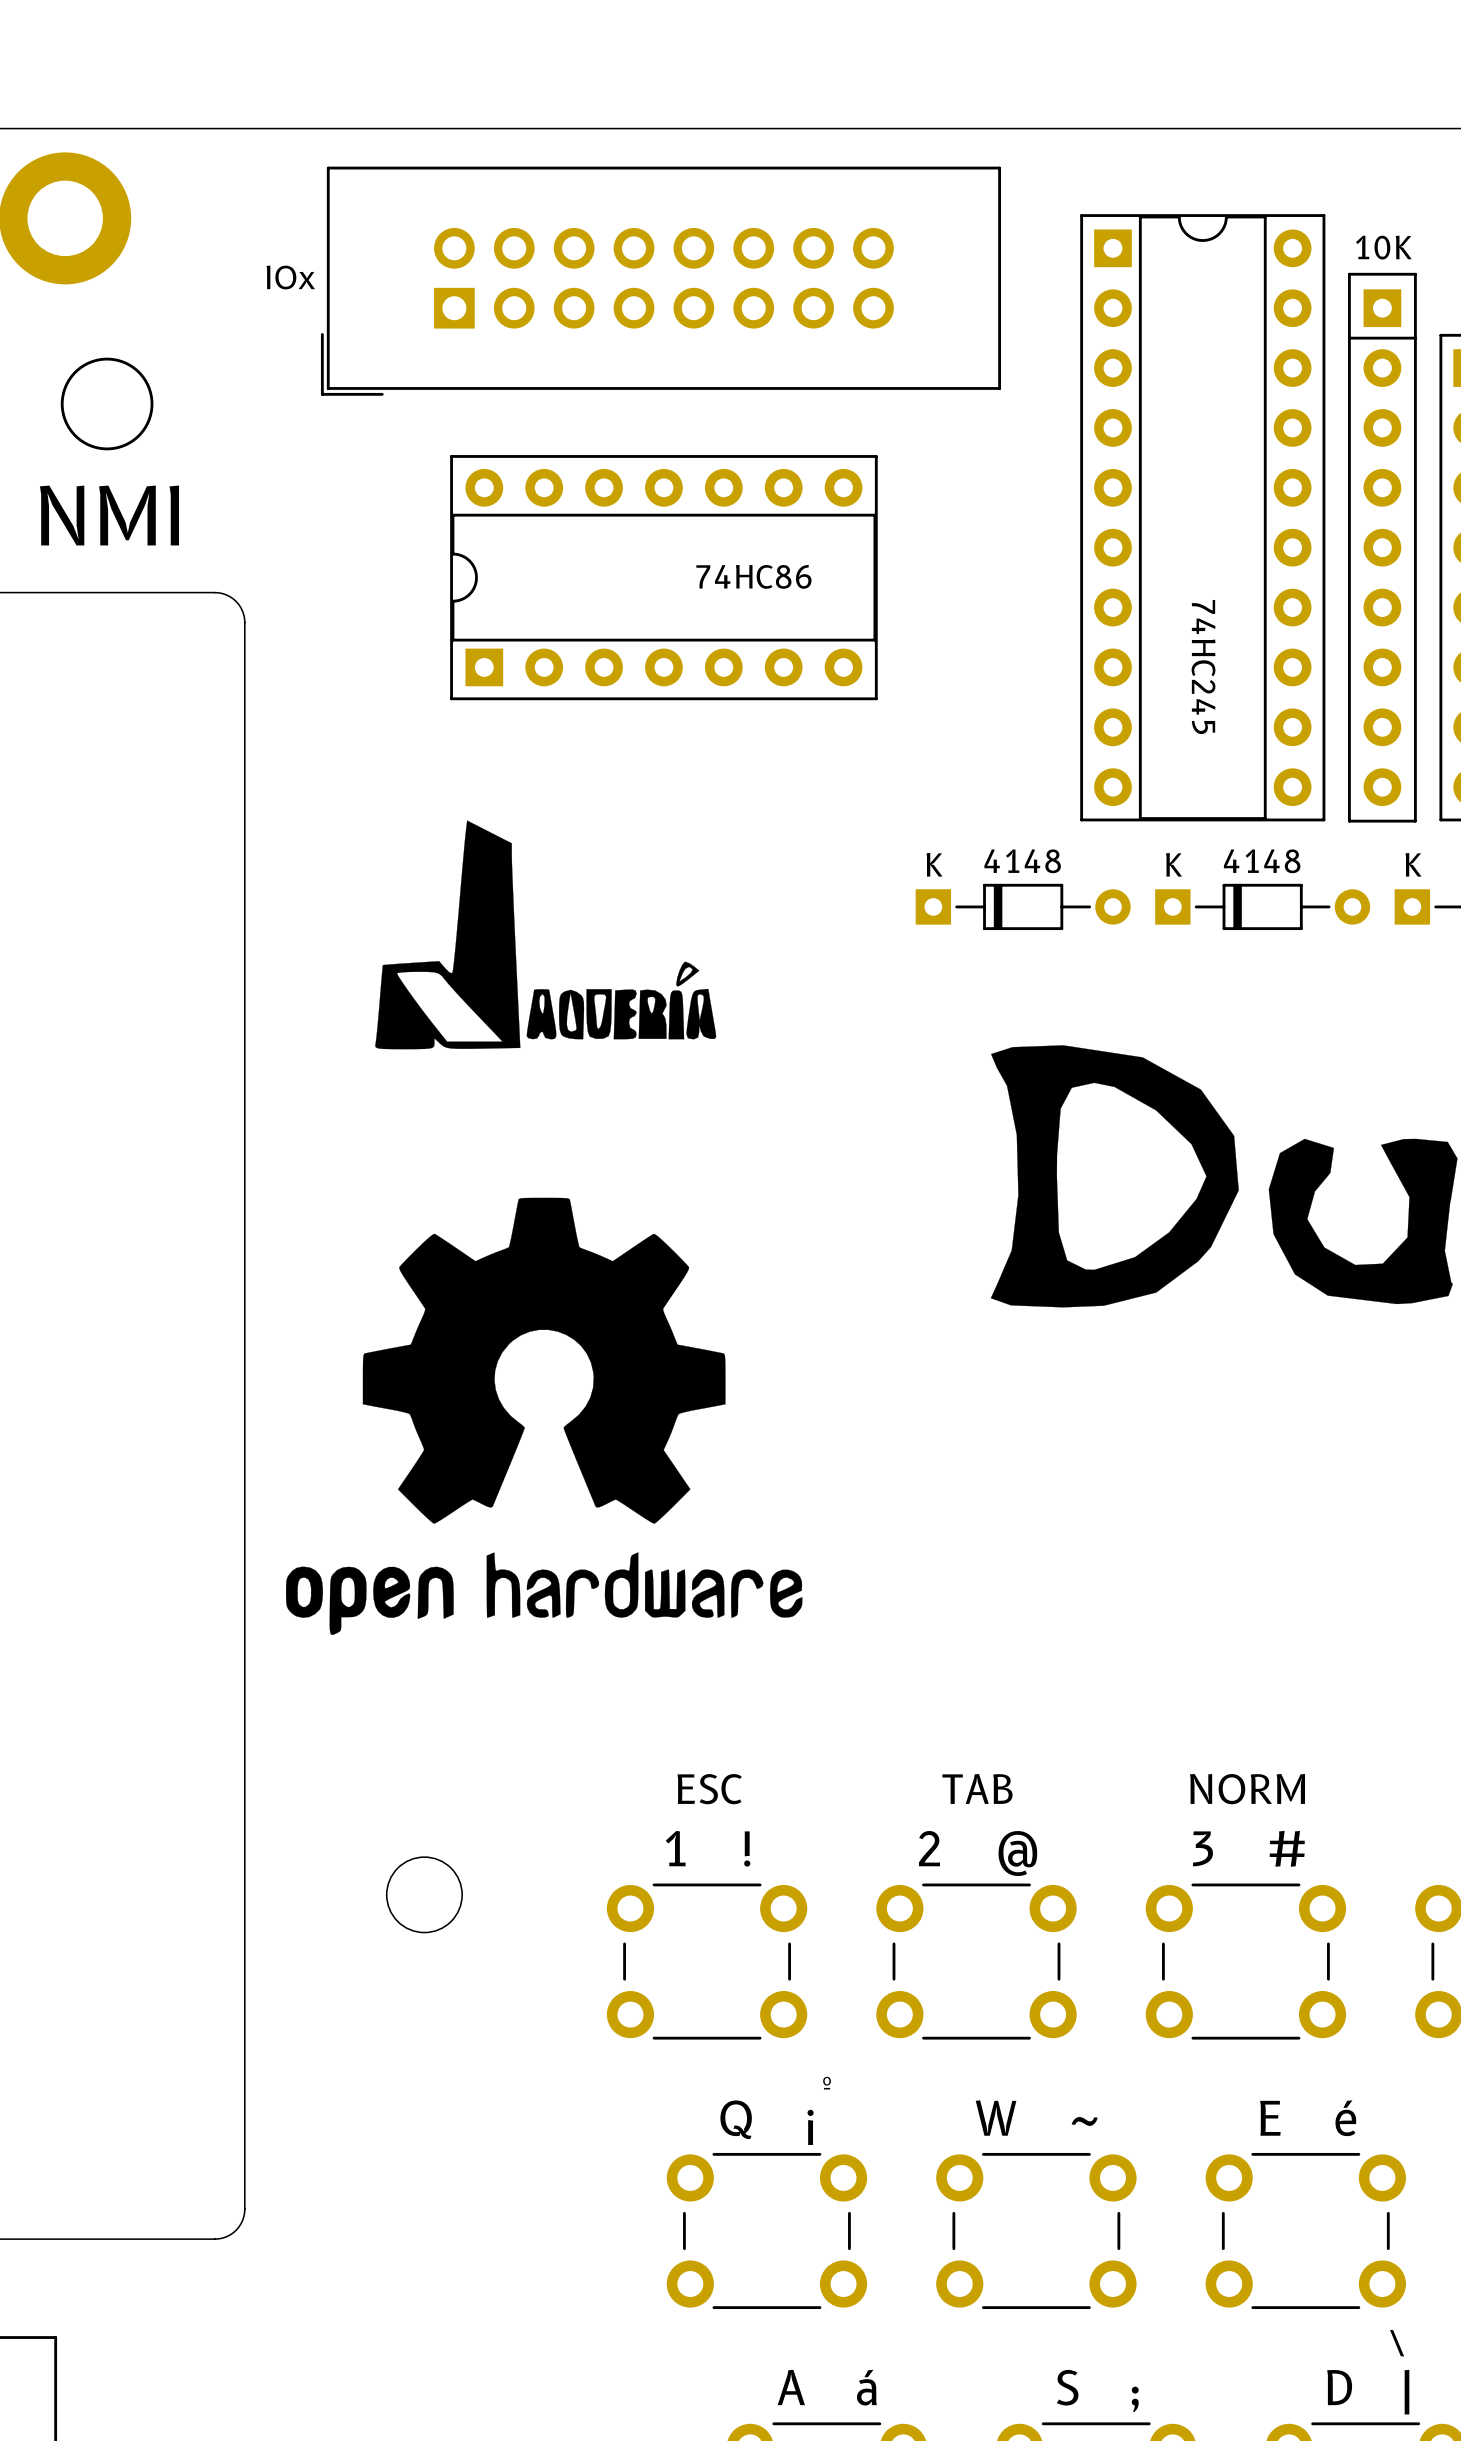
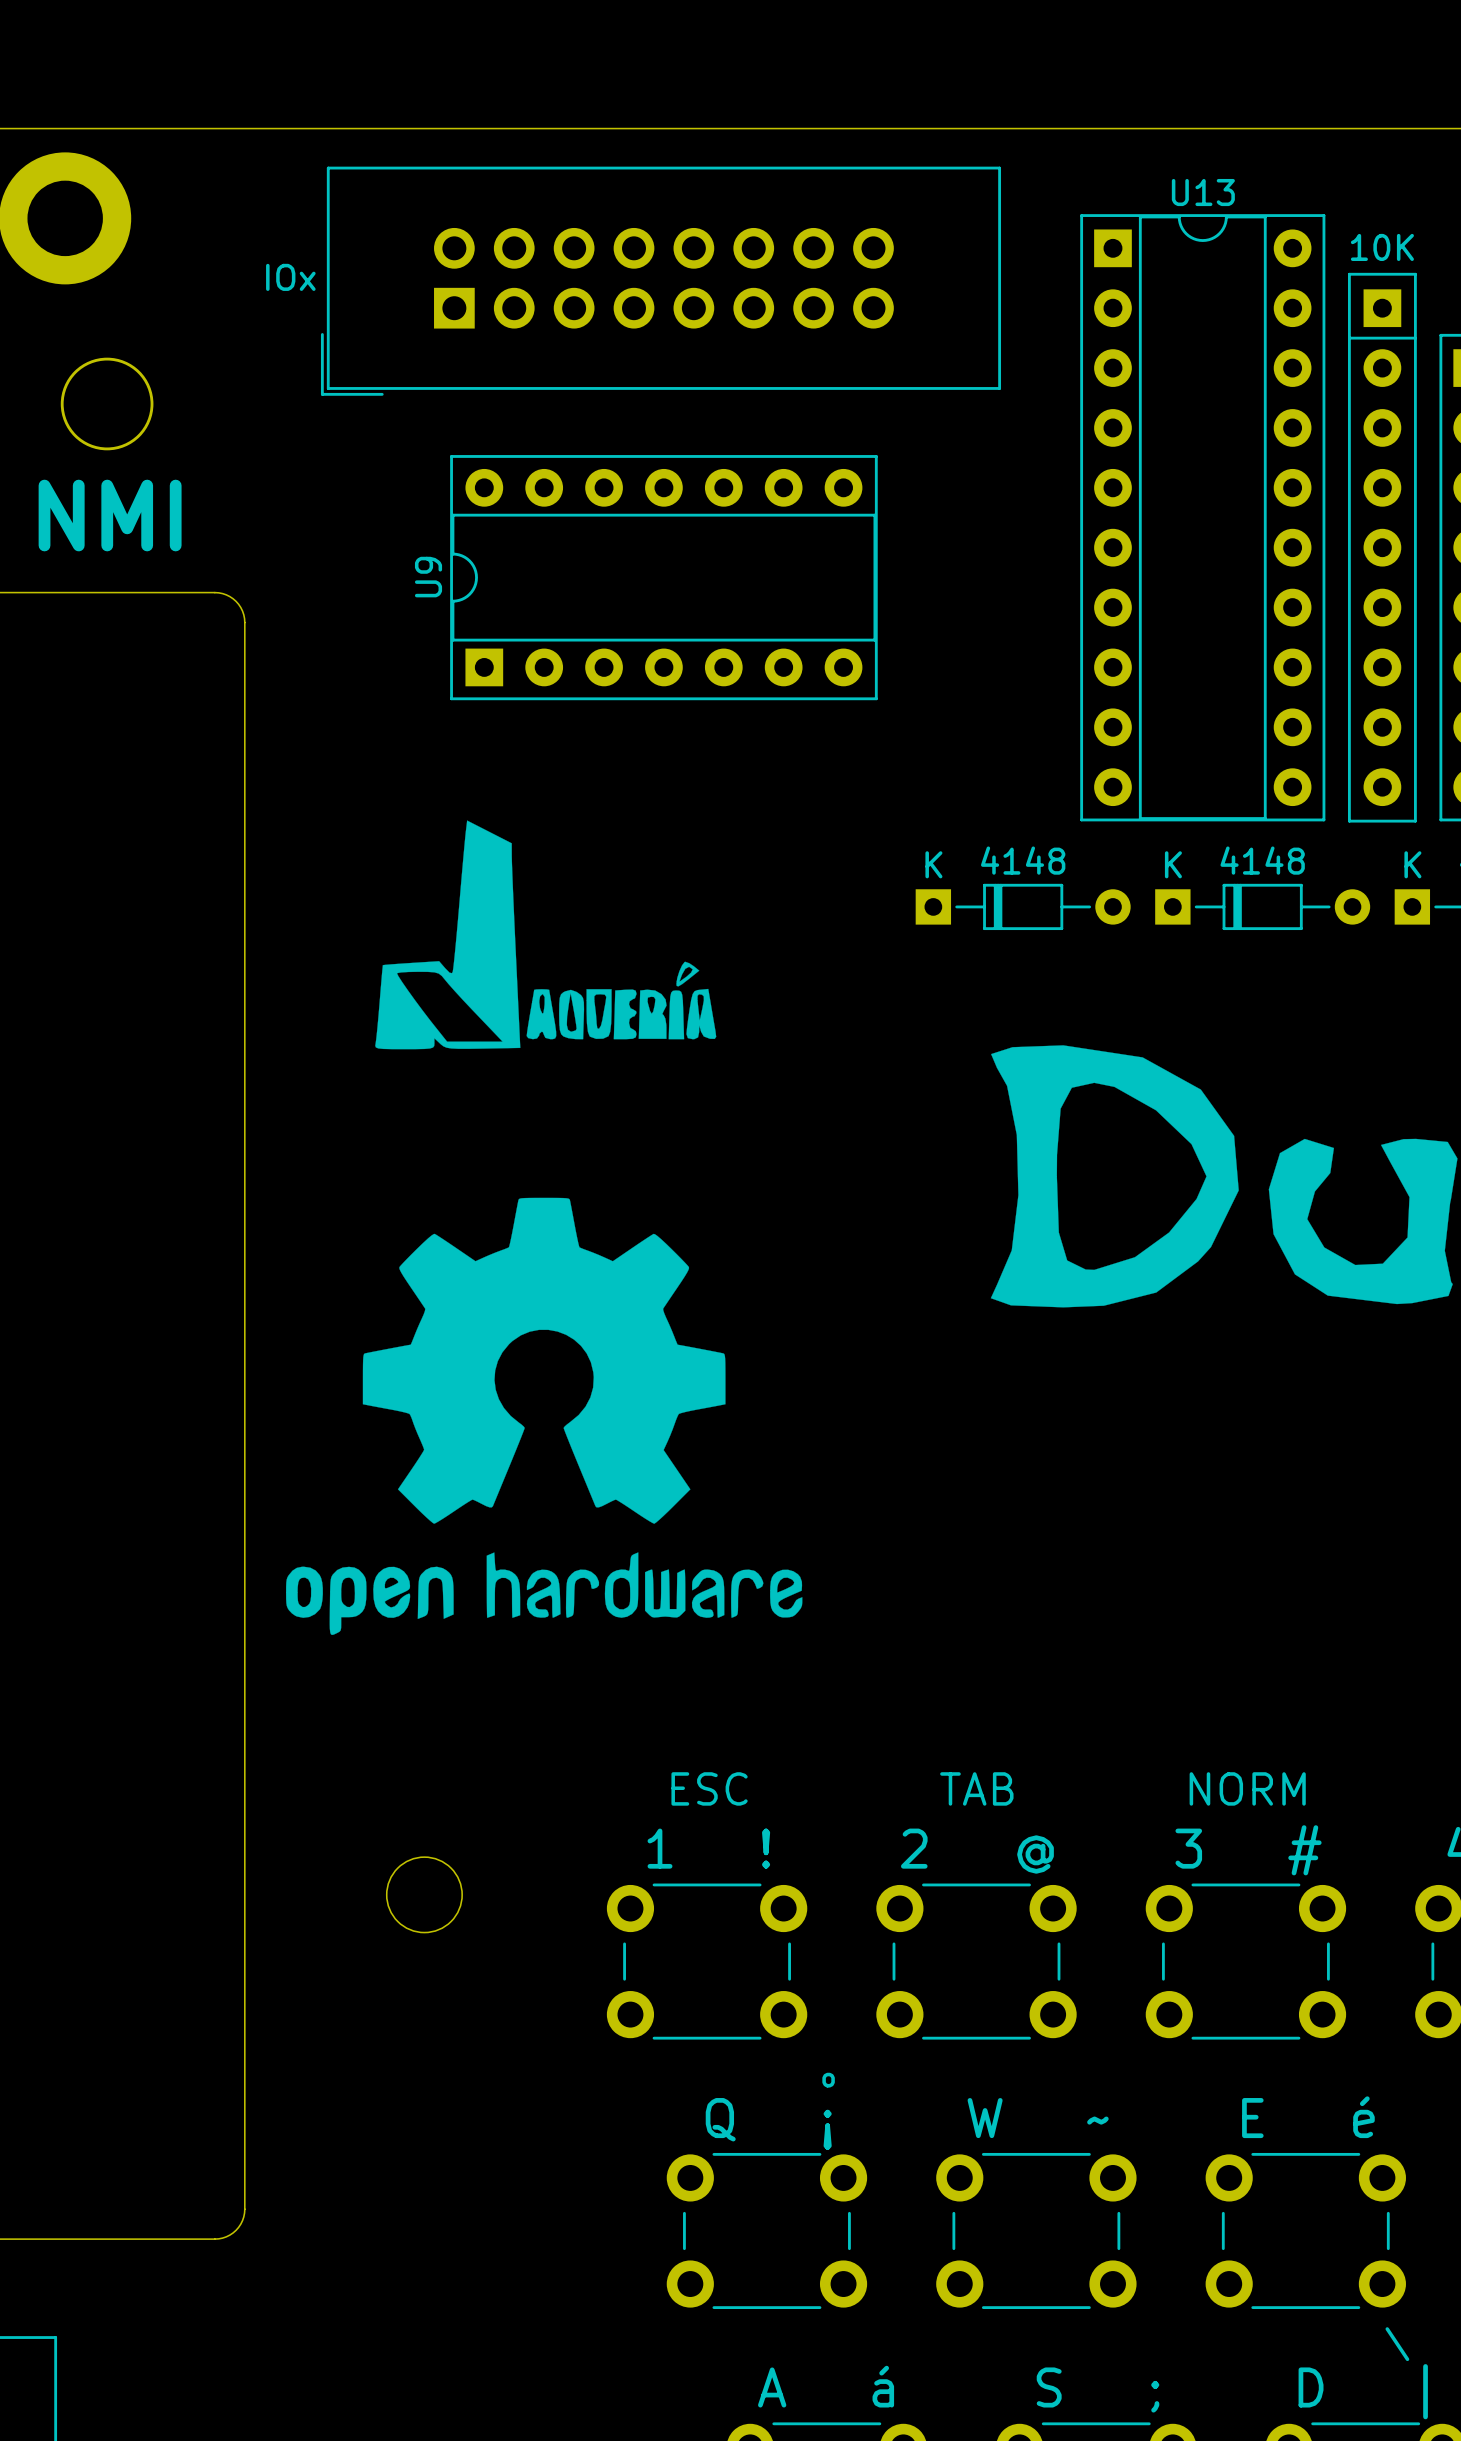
U13 name: none -> U13 (1203, 192)
U9 value: 74HC86 (753, 576) -> none
U9 name: none -> U9 (428, 577)
U13 value: 74HC245 (1203, 667) -> none

